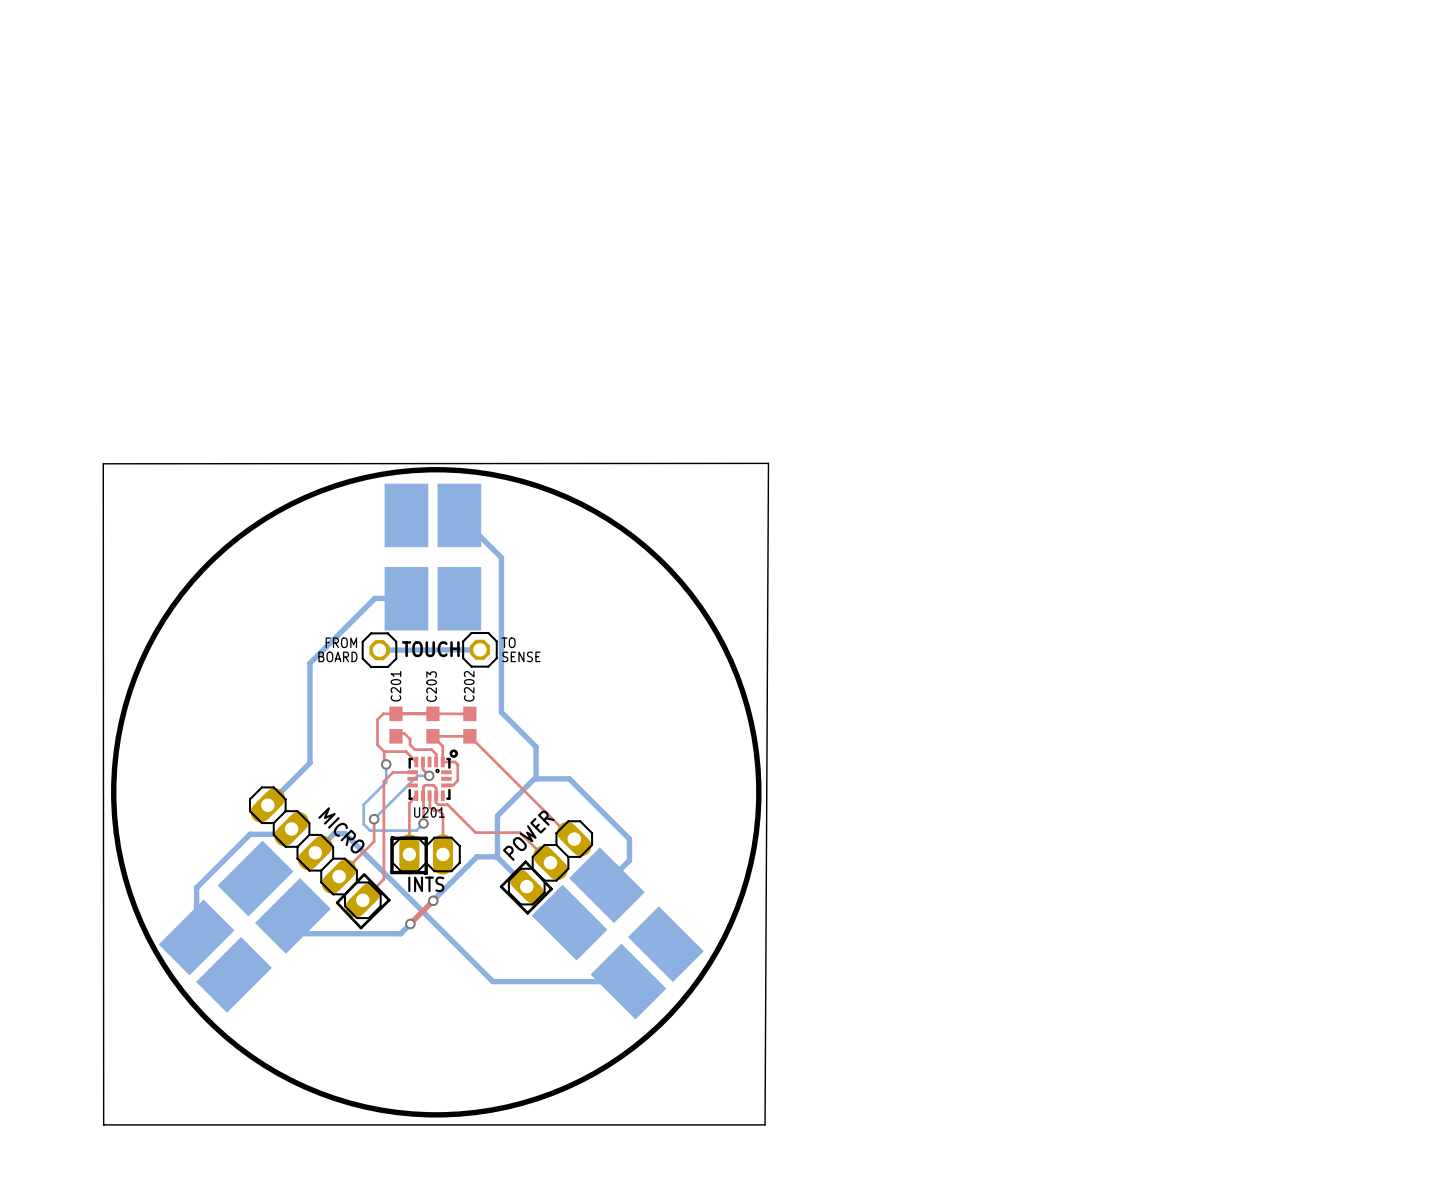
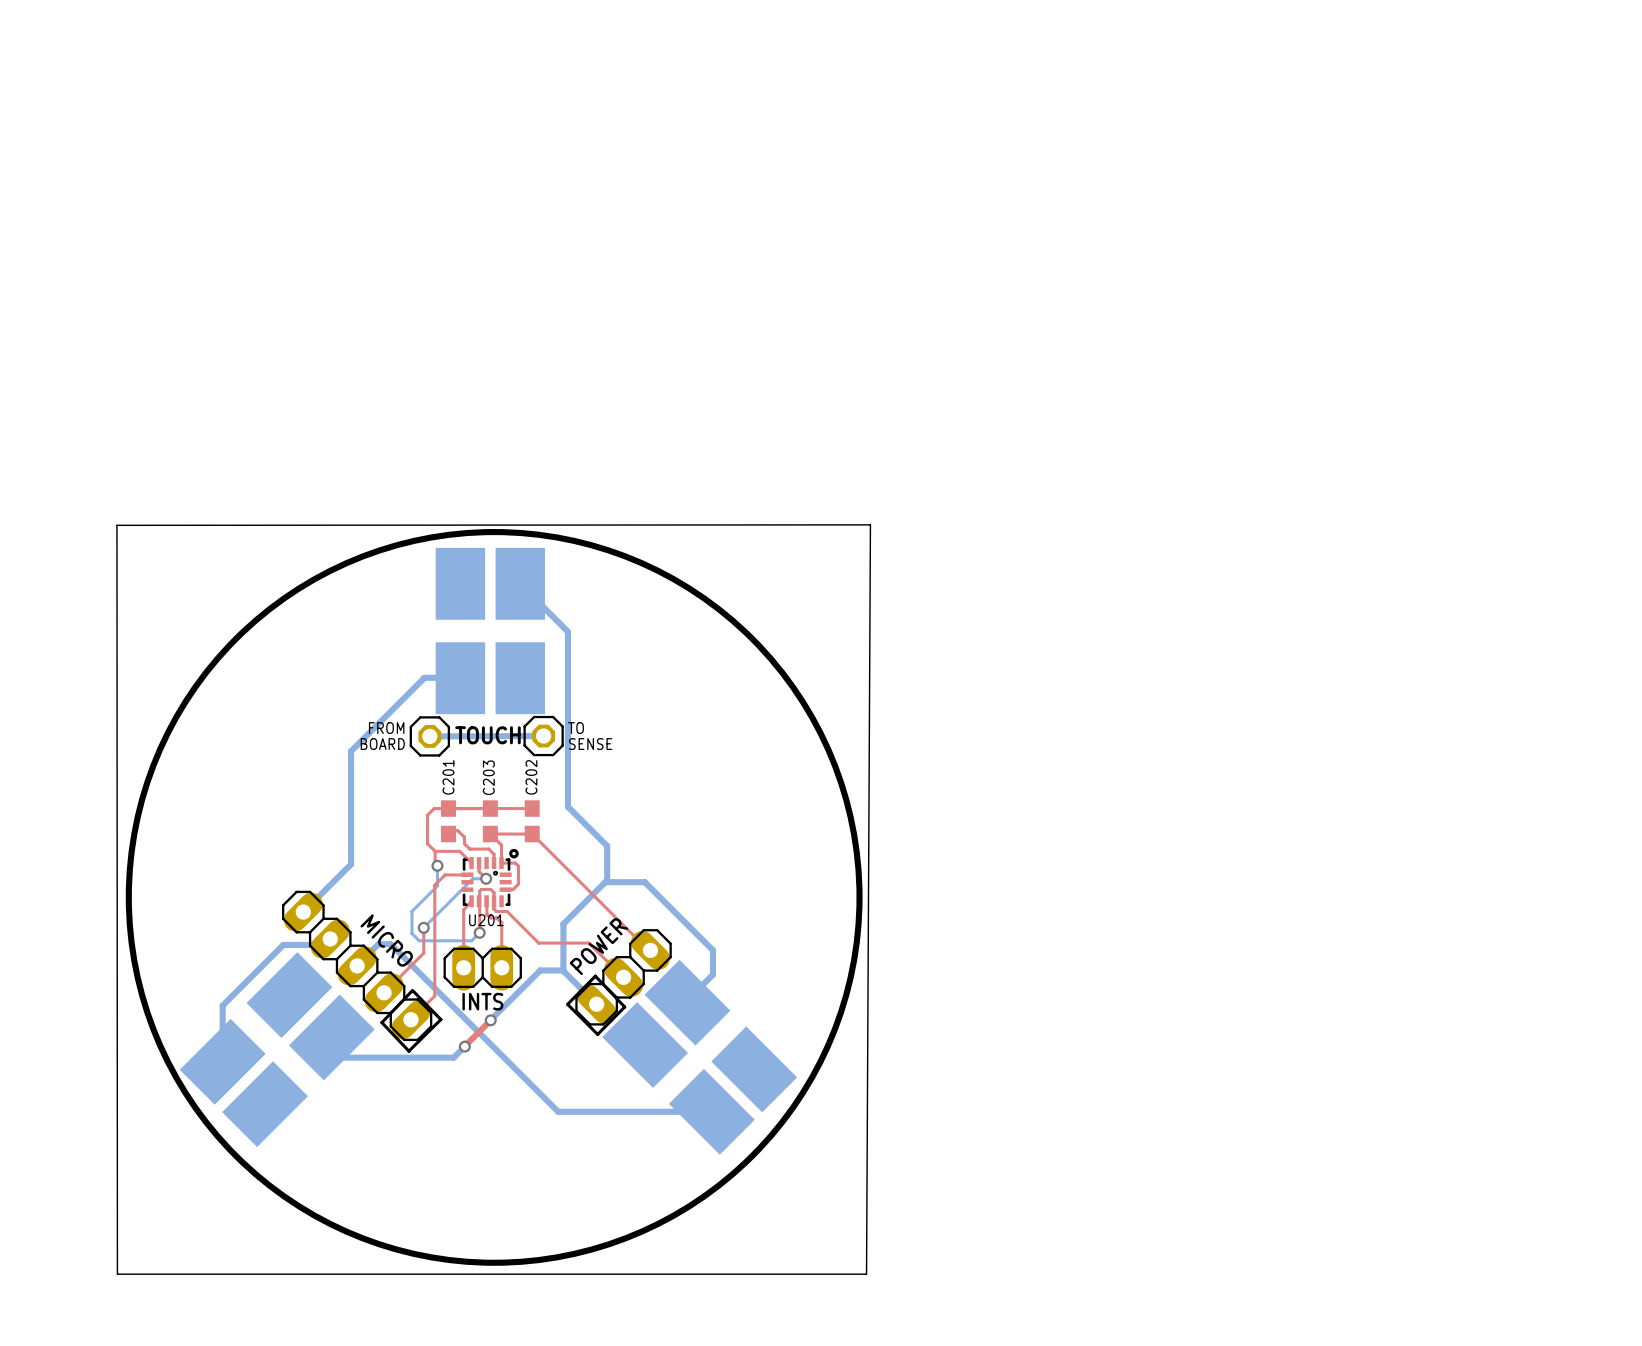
line: (392, 837) (426, 838) (426, 873) (391, 872) (391, 837) -> none

